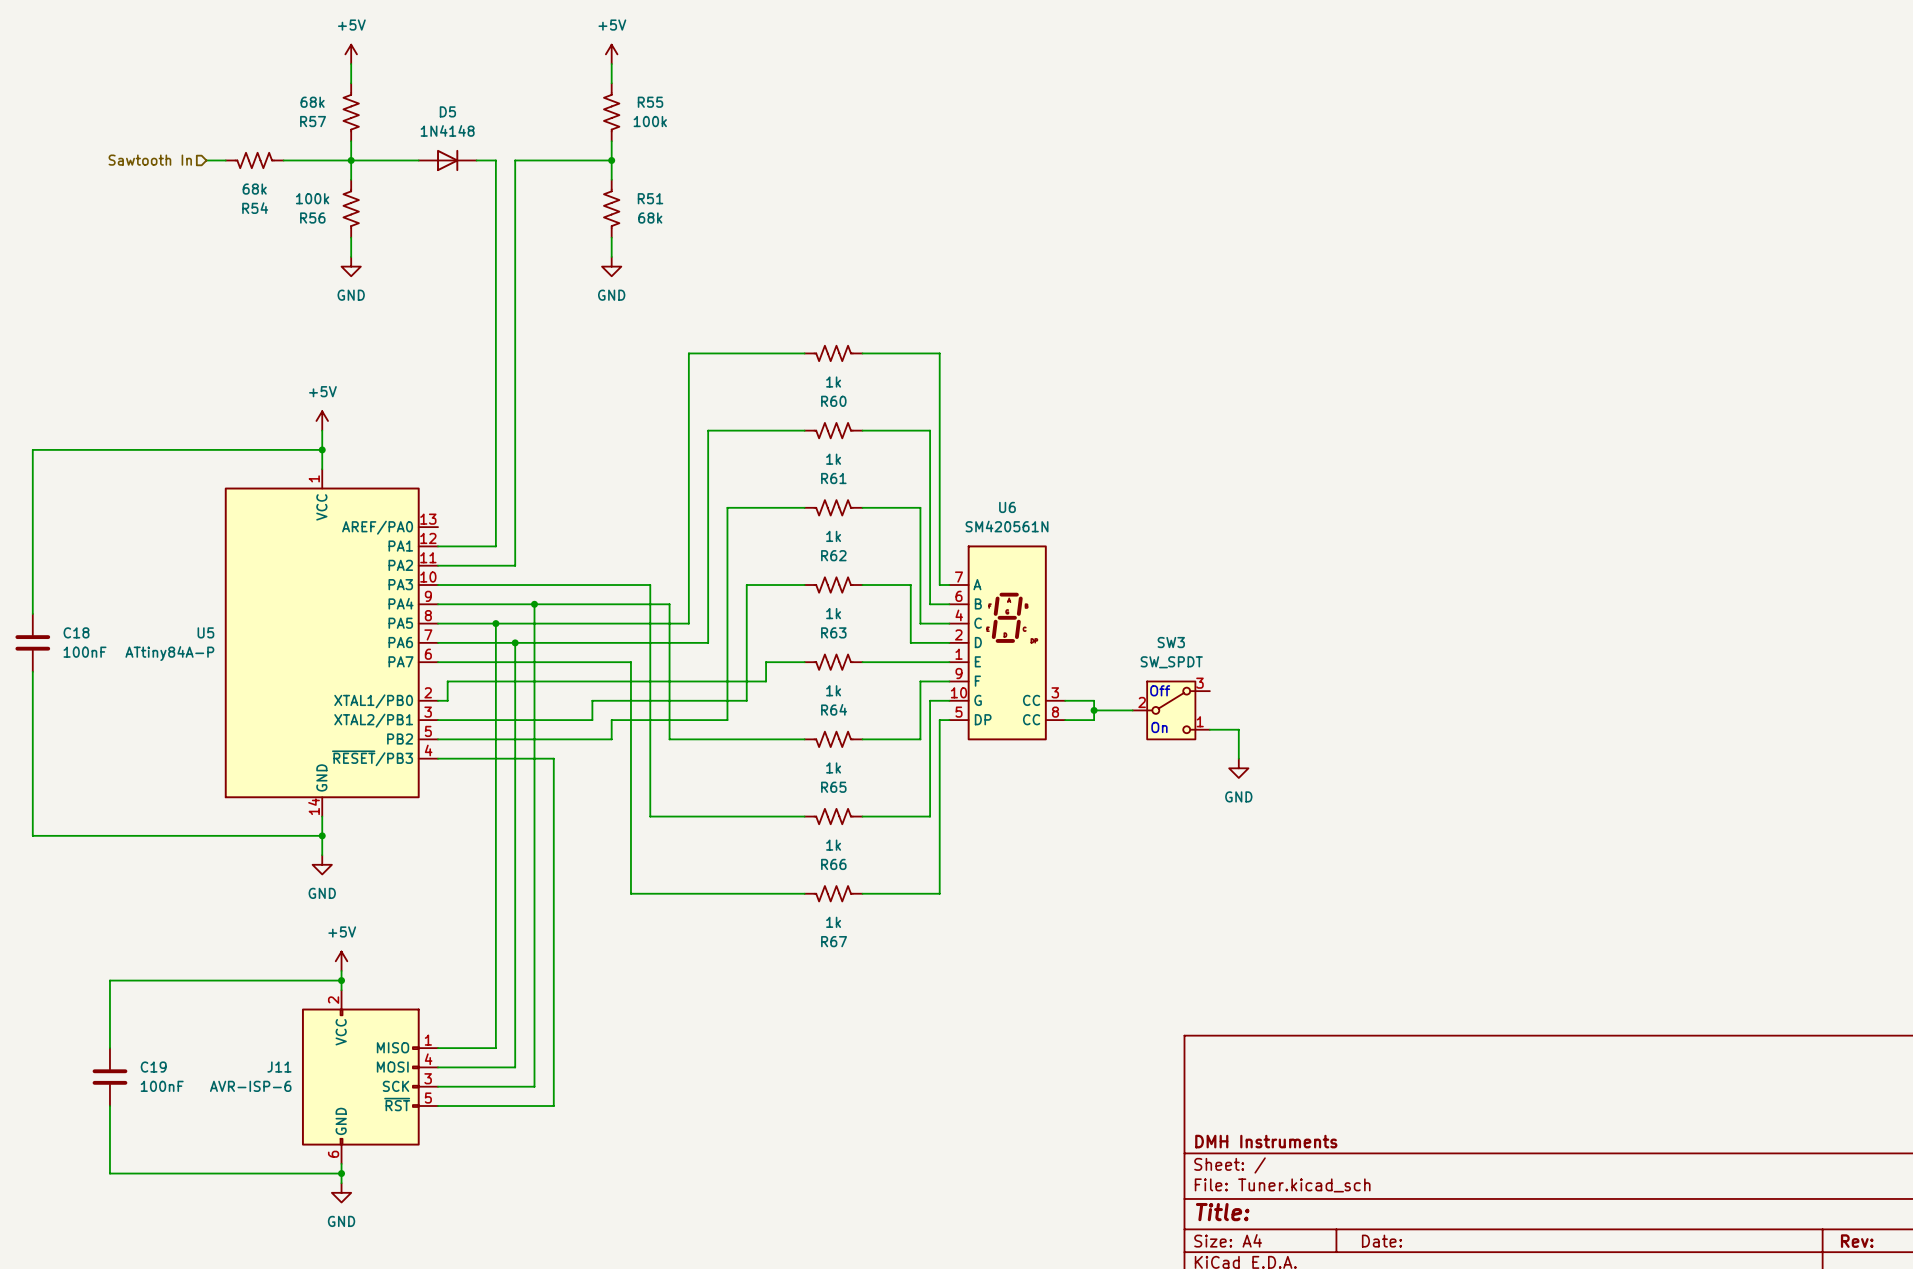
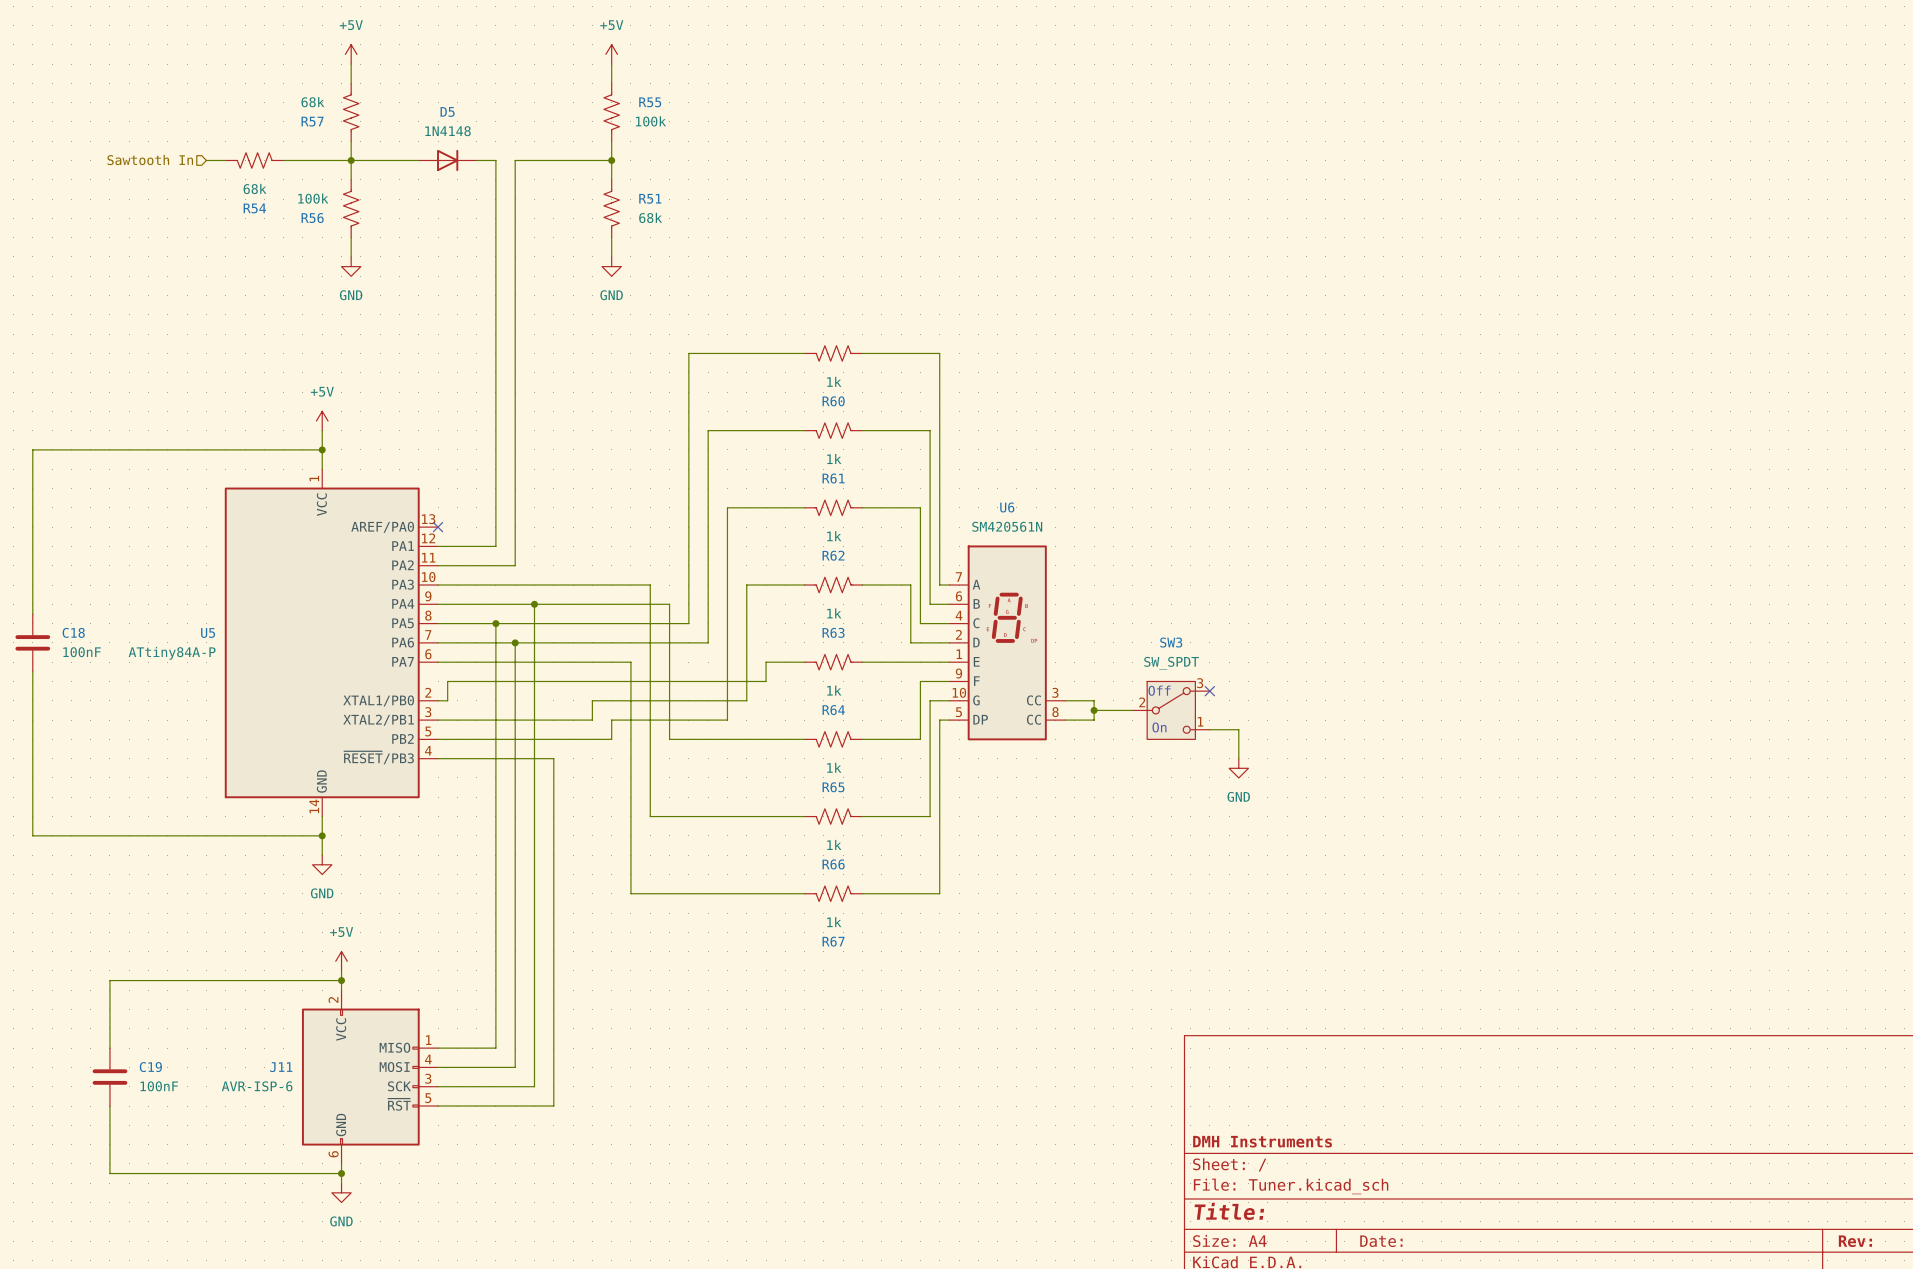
no-connect mark: none -> (438, 527)
no-connect mark: none -> (1209, 691)

